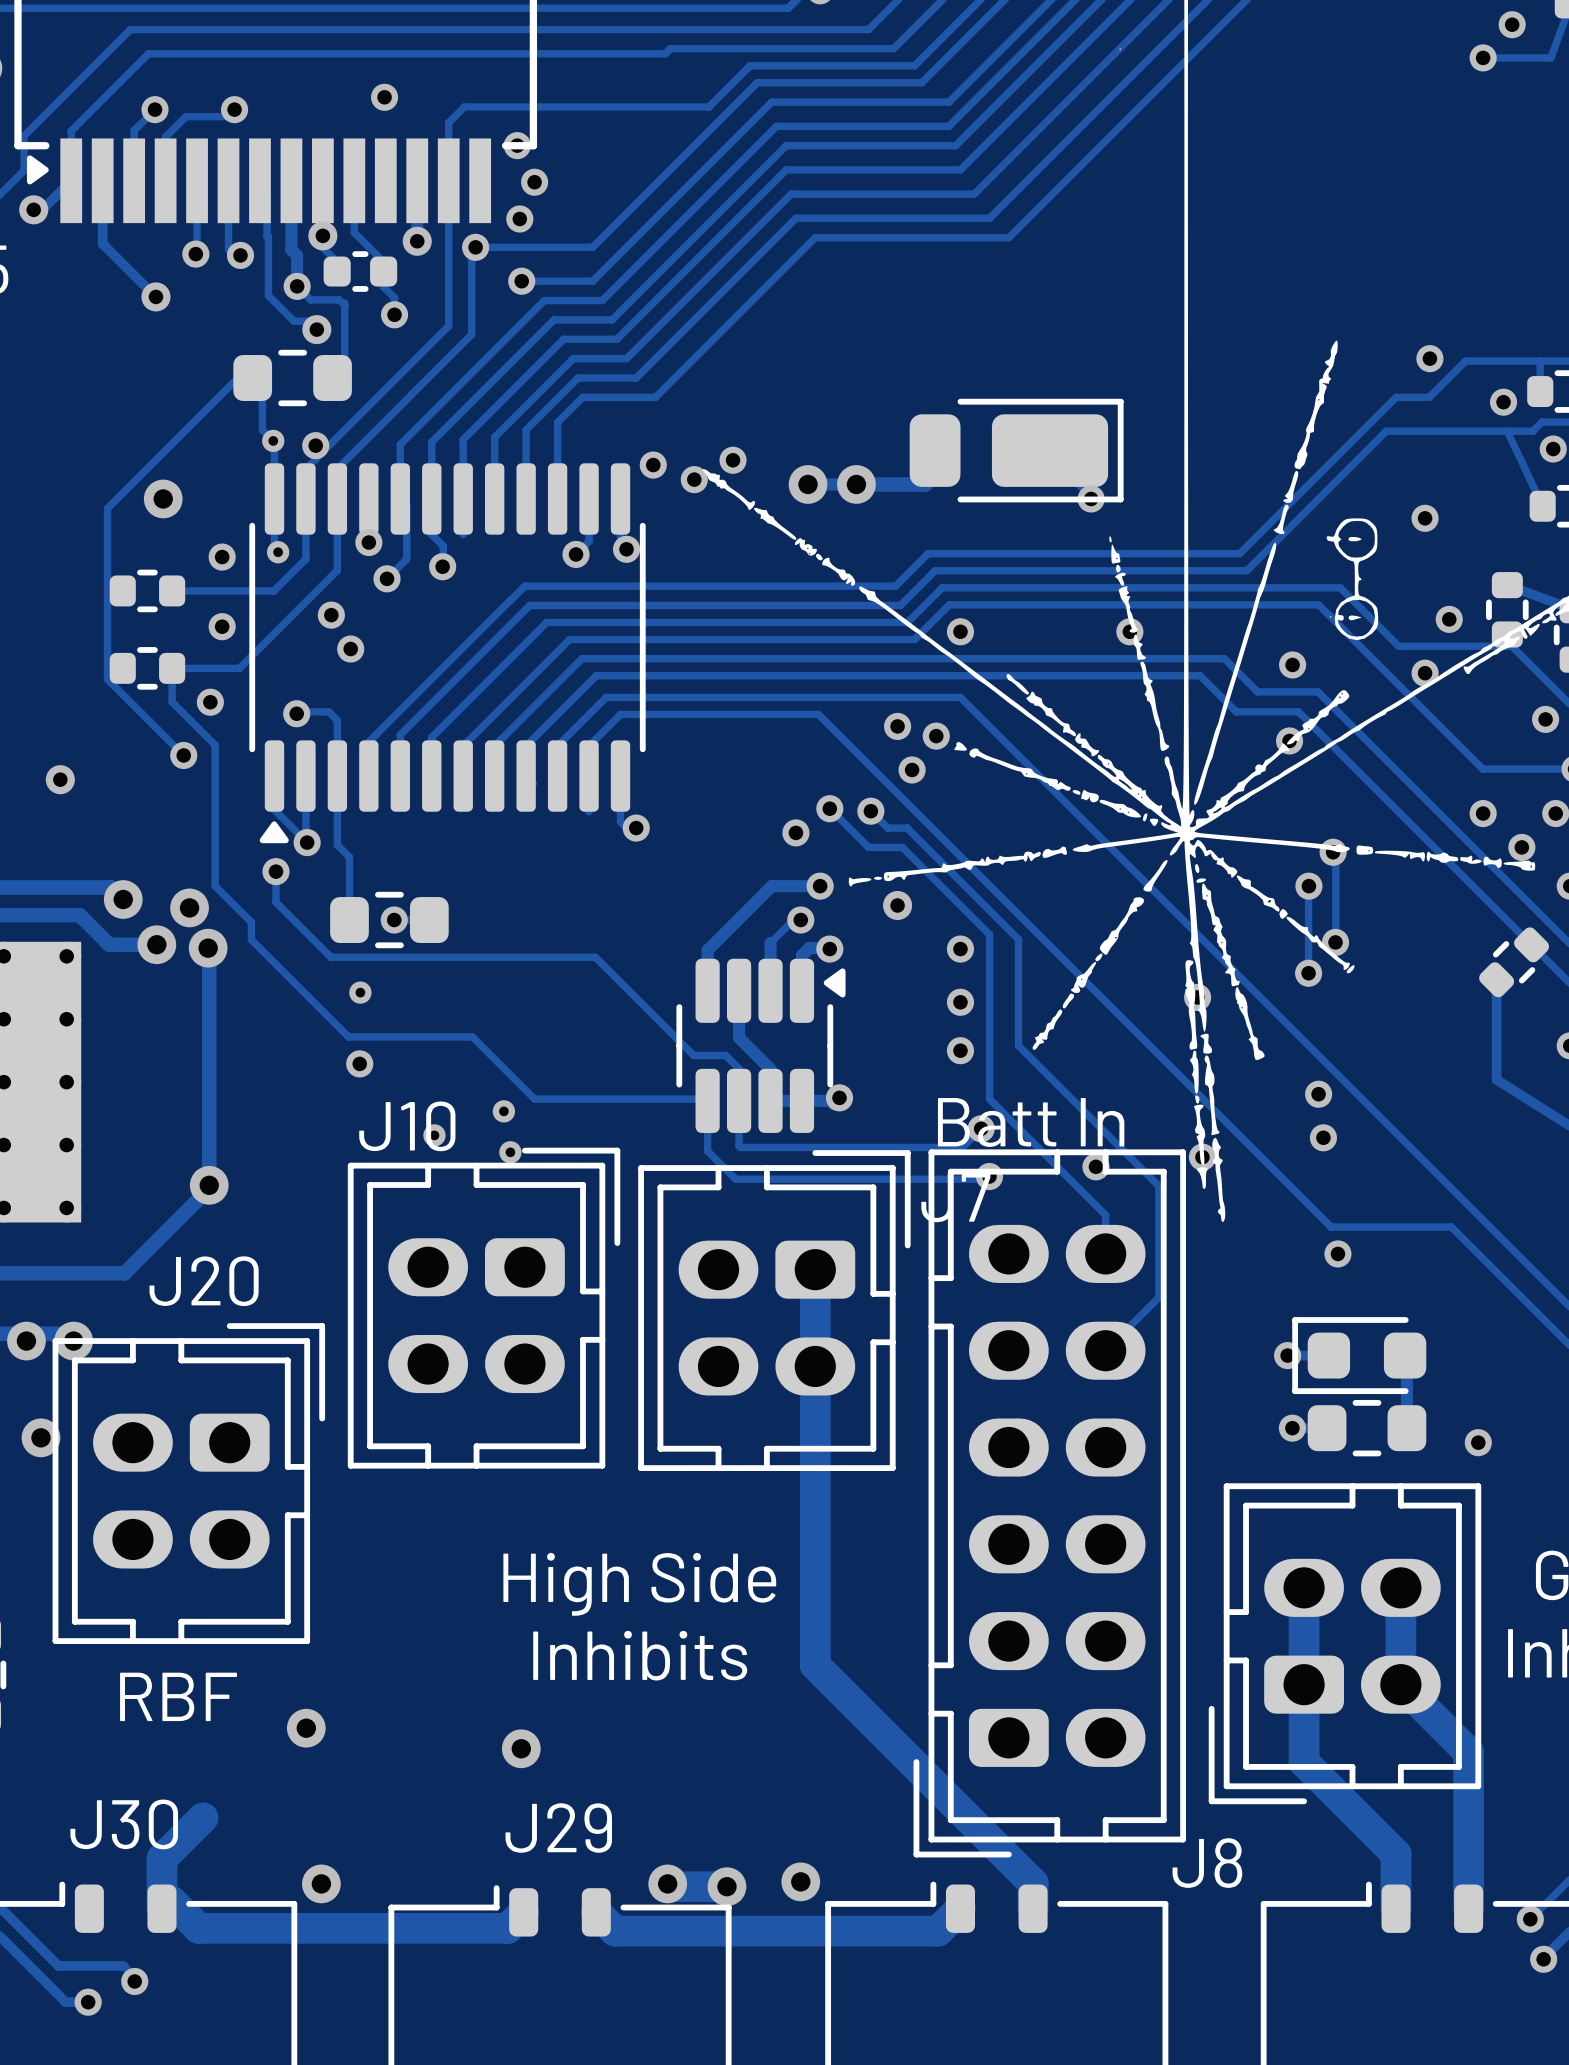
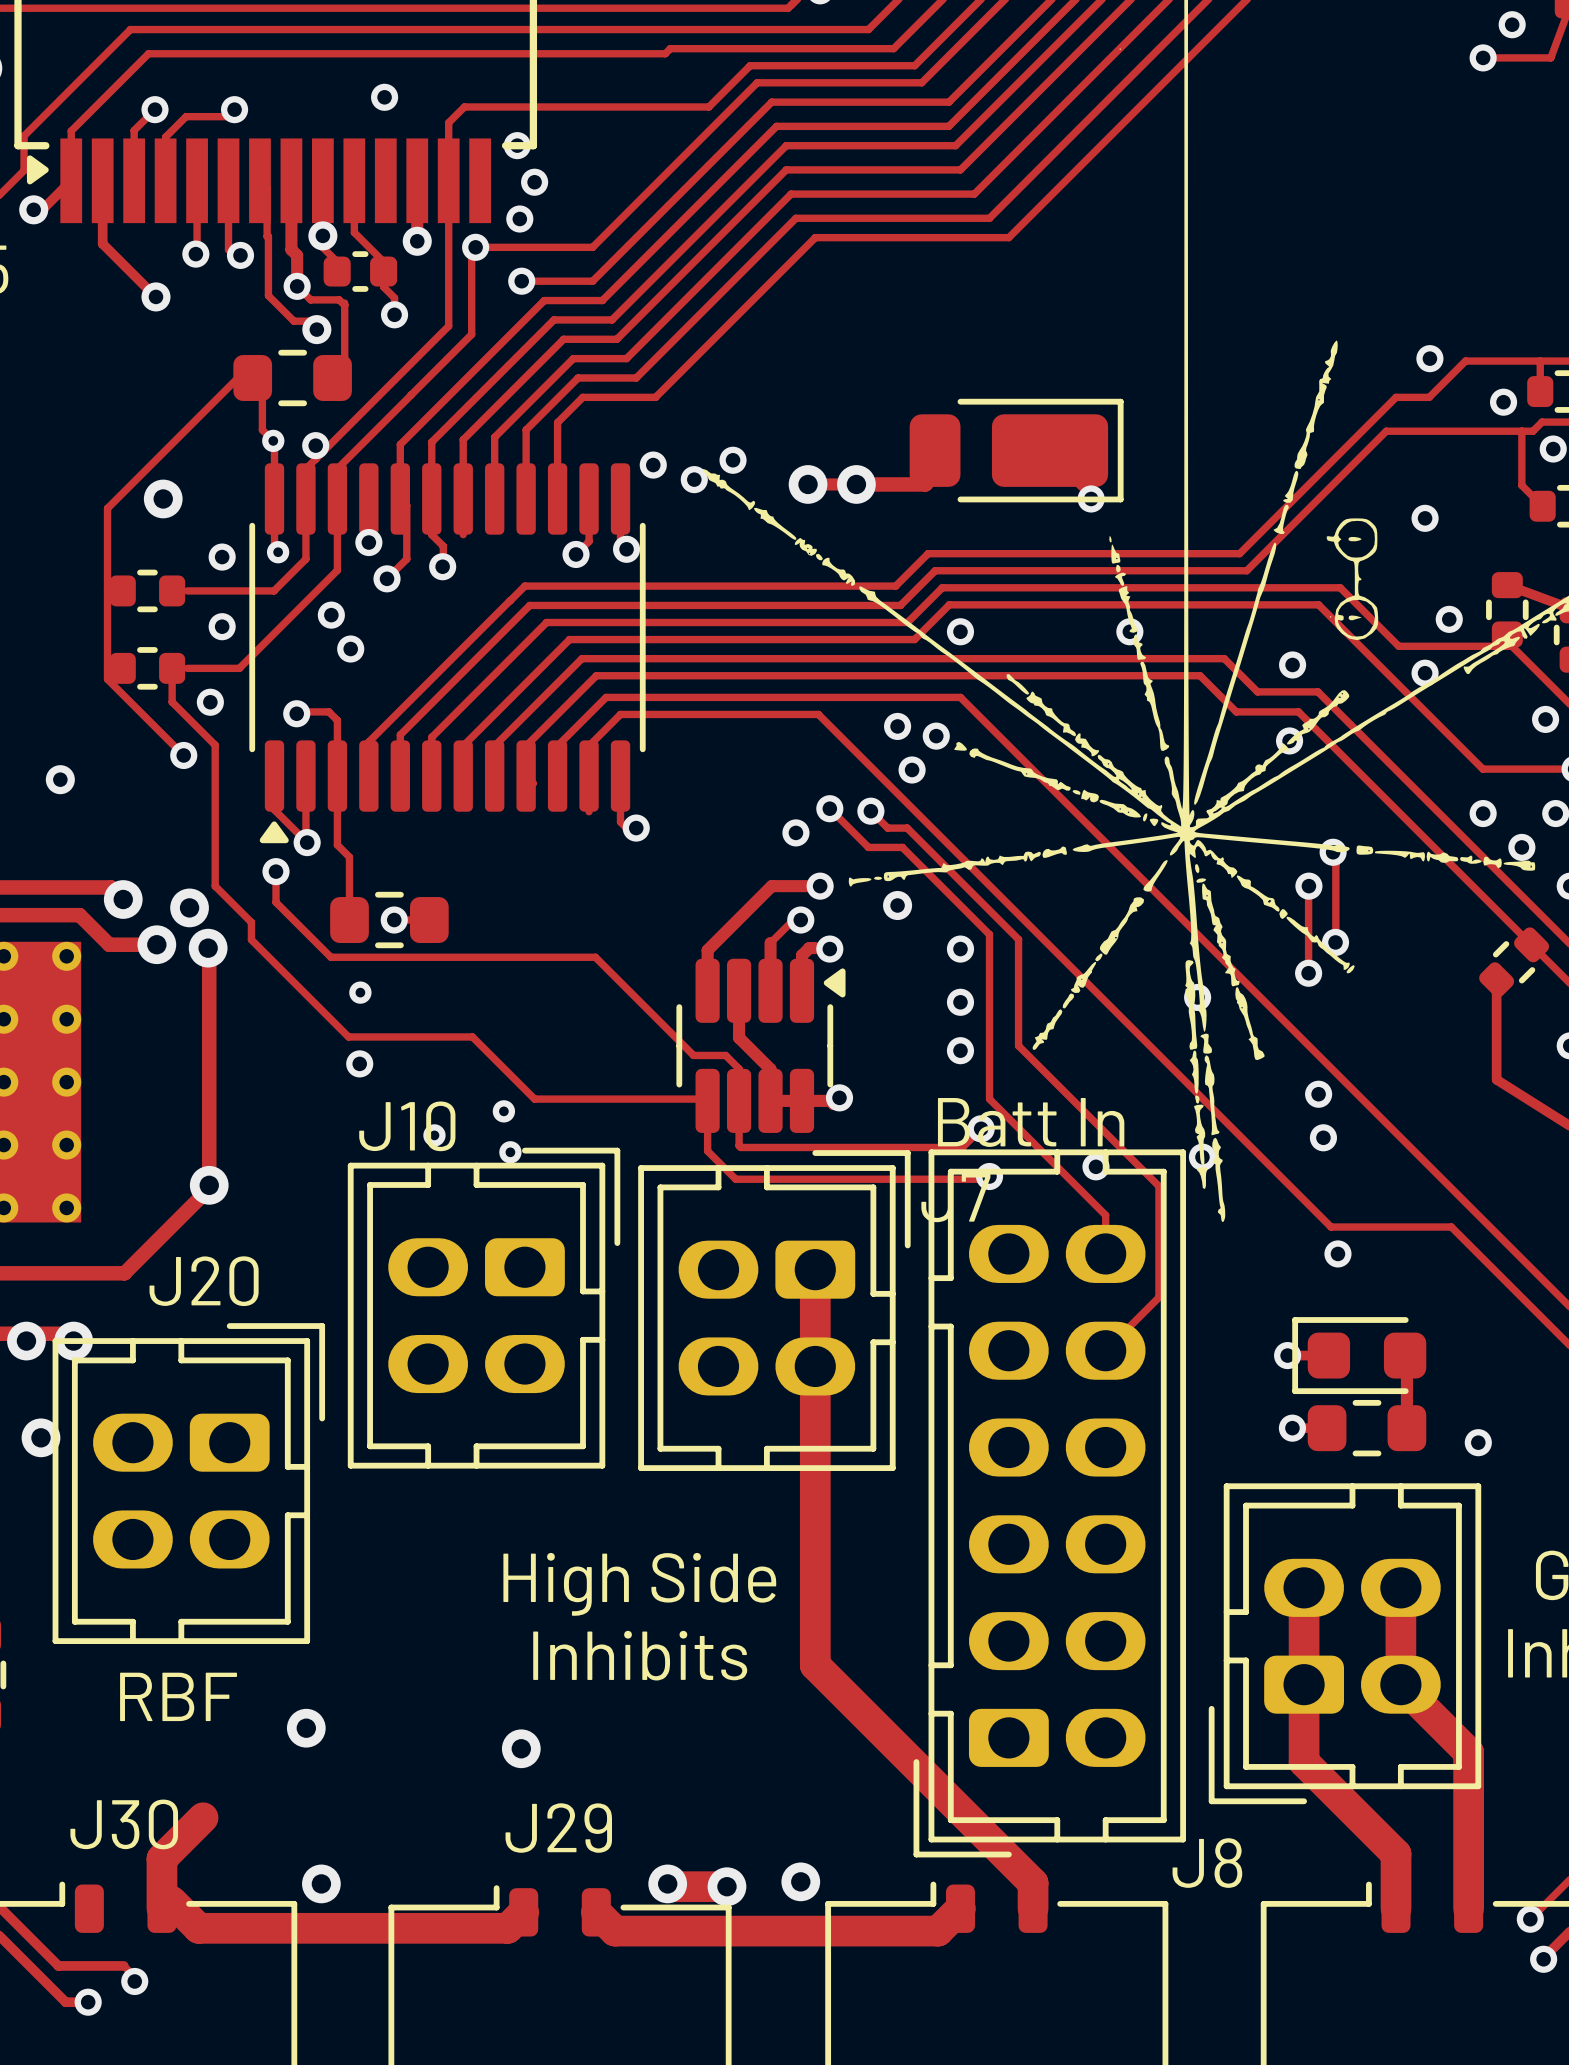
track: (1507, 431) (1542, 506) -> (1521, 431) (1521, 485) (1542, 506)

